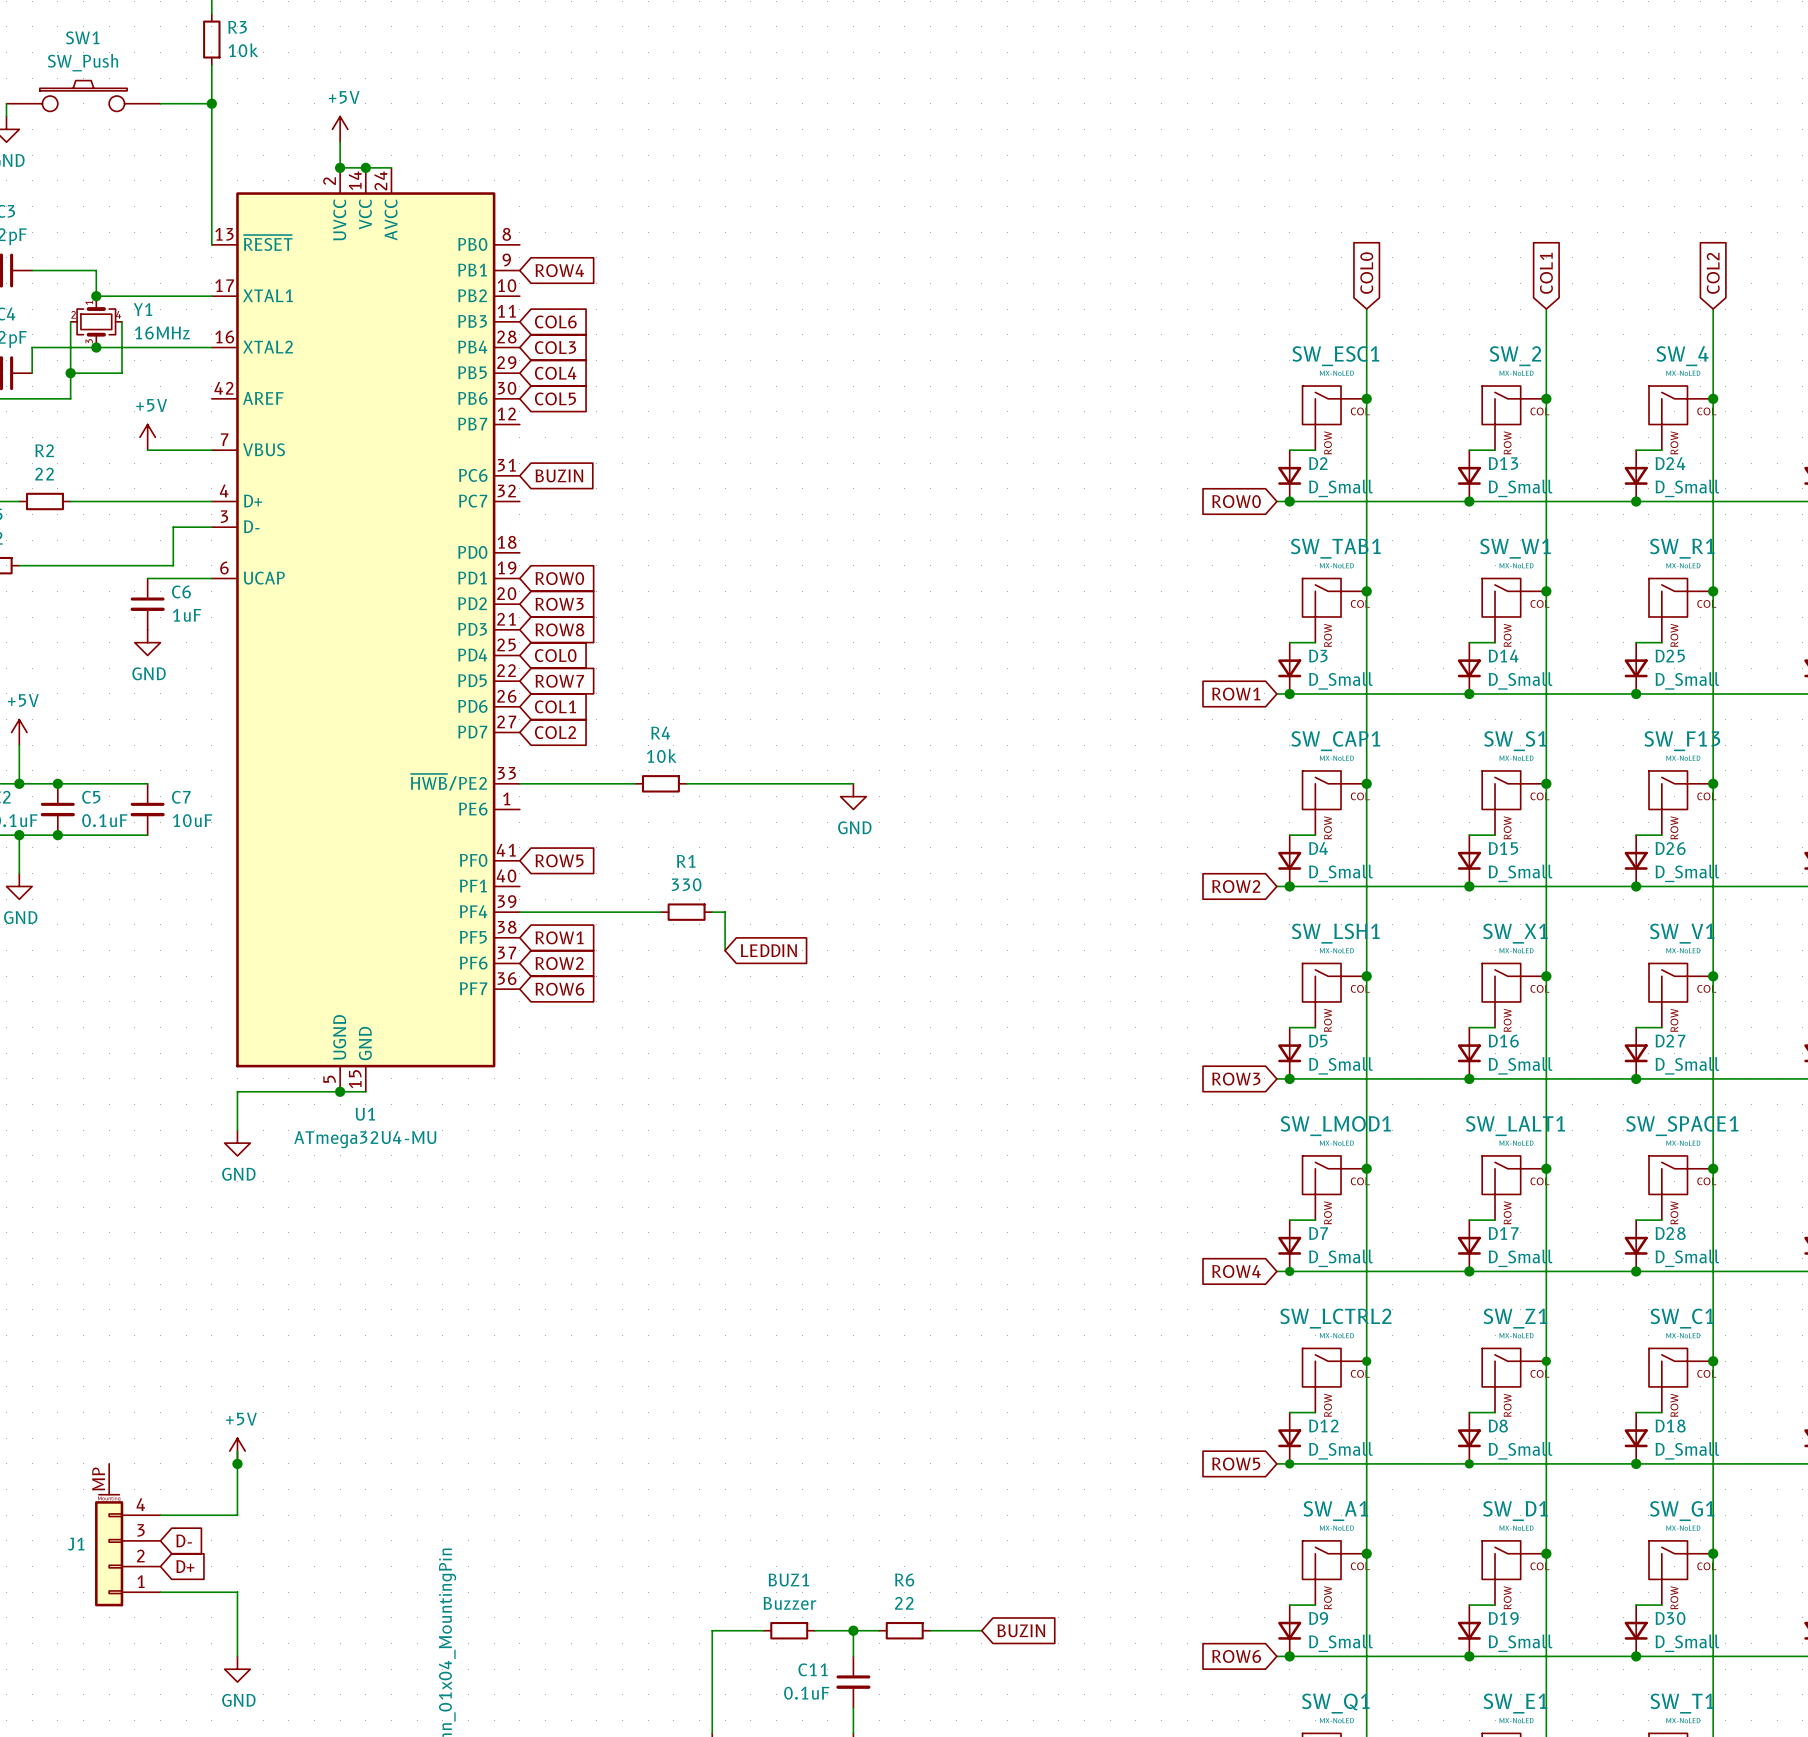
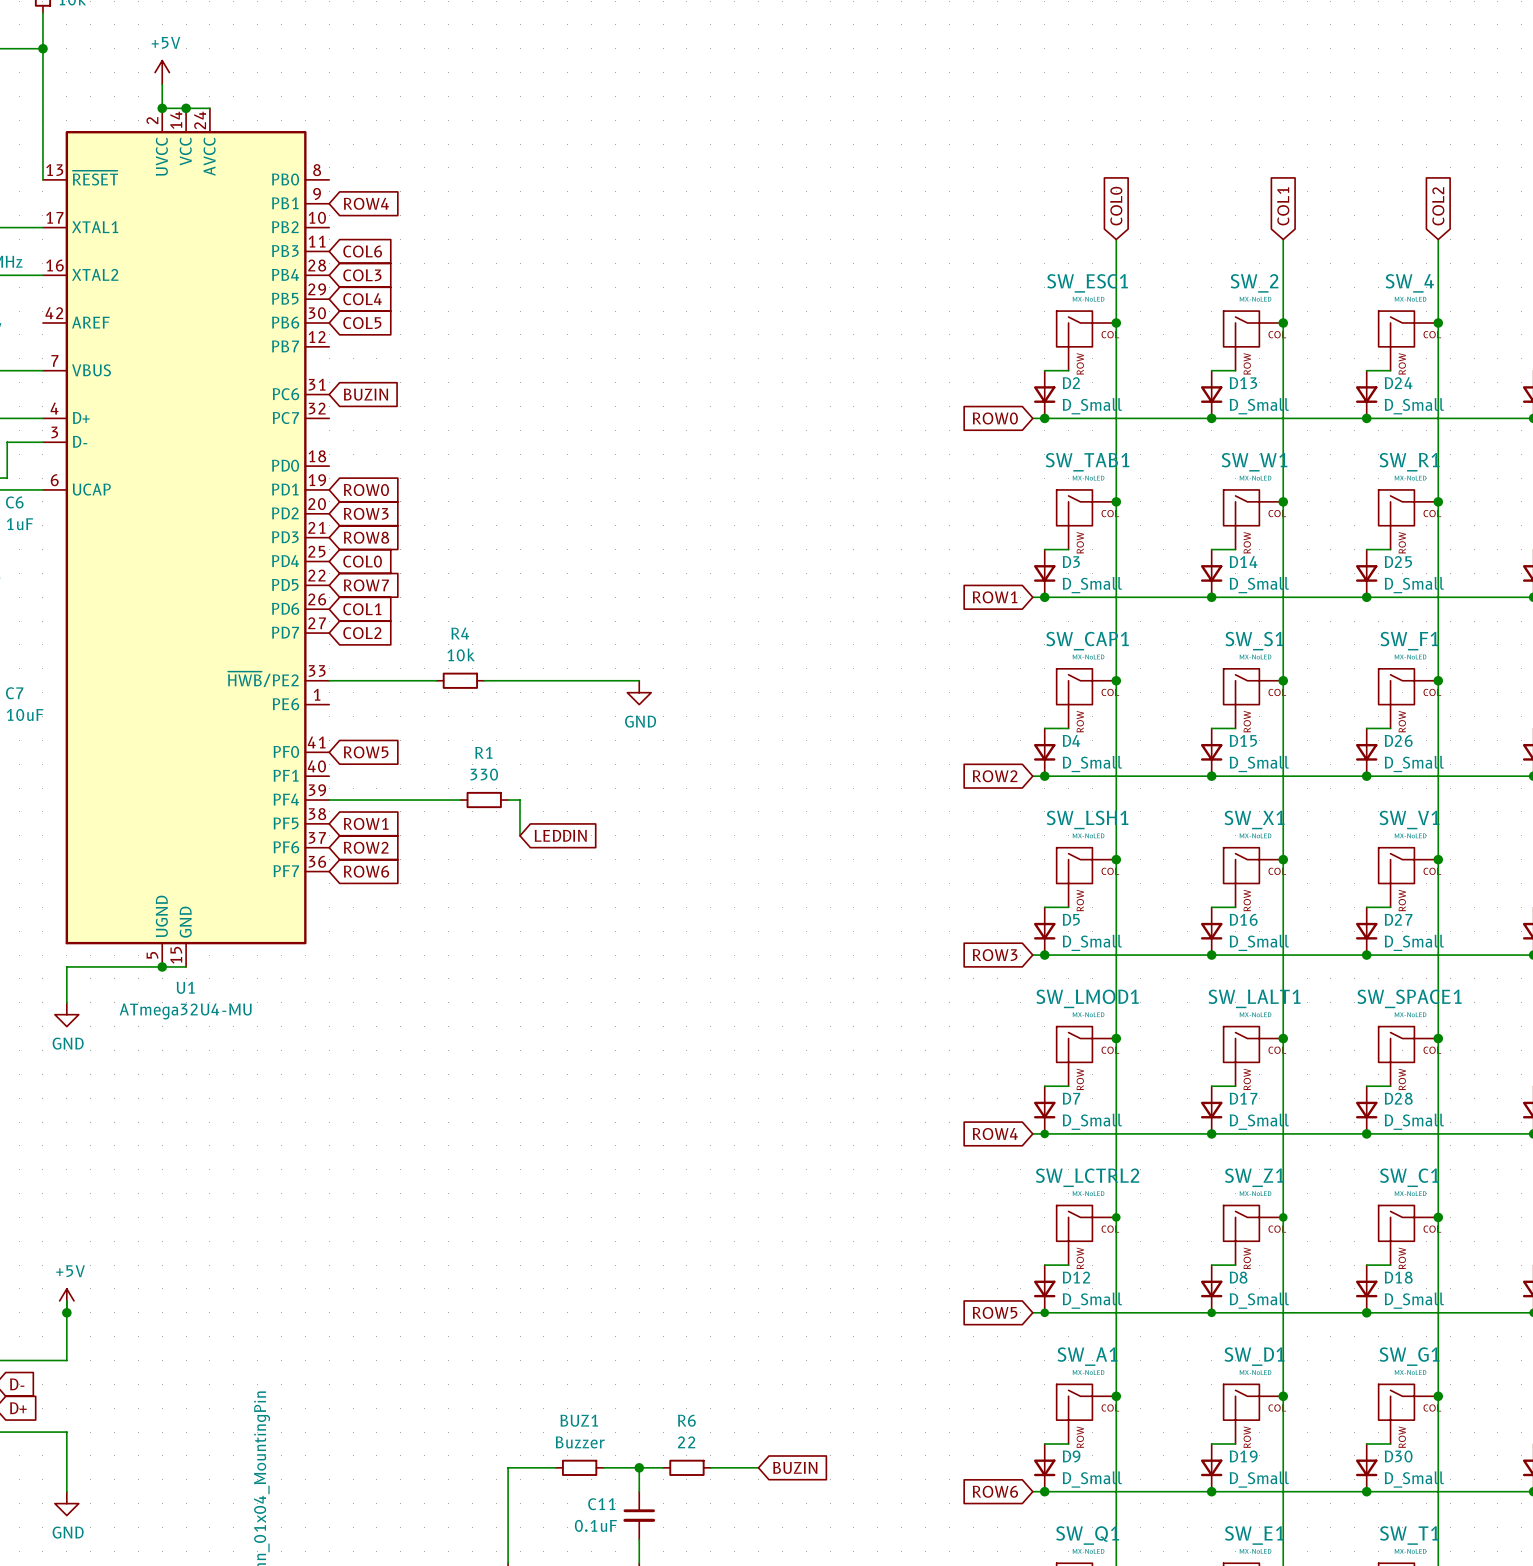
SW_F13 name: SW_F13 (1682, 741) -> SW_F1 (1409, 641)

